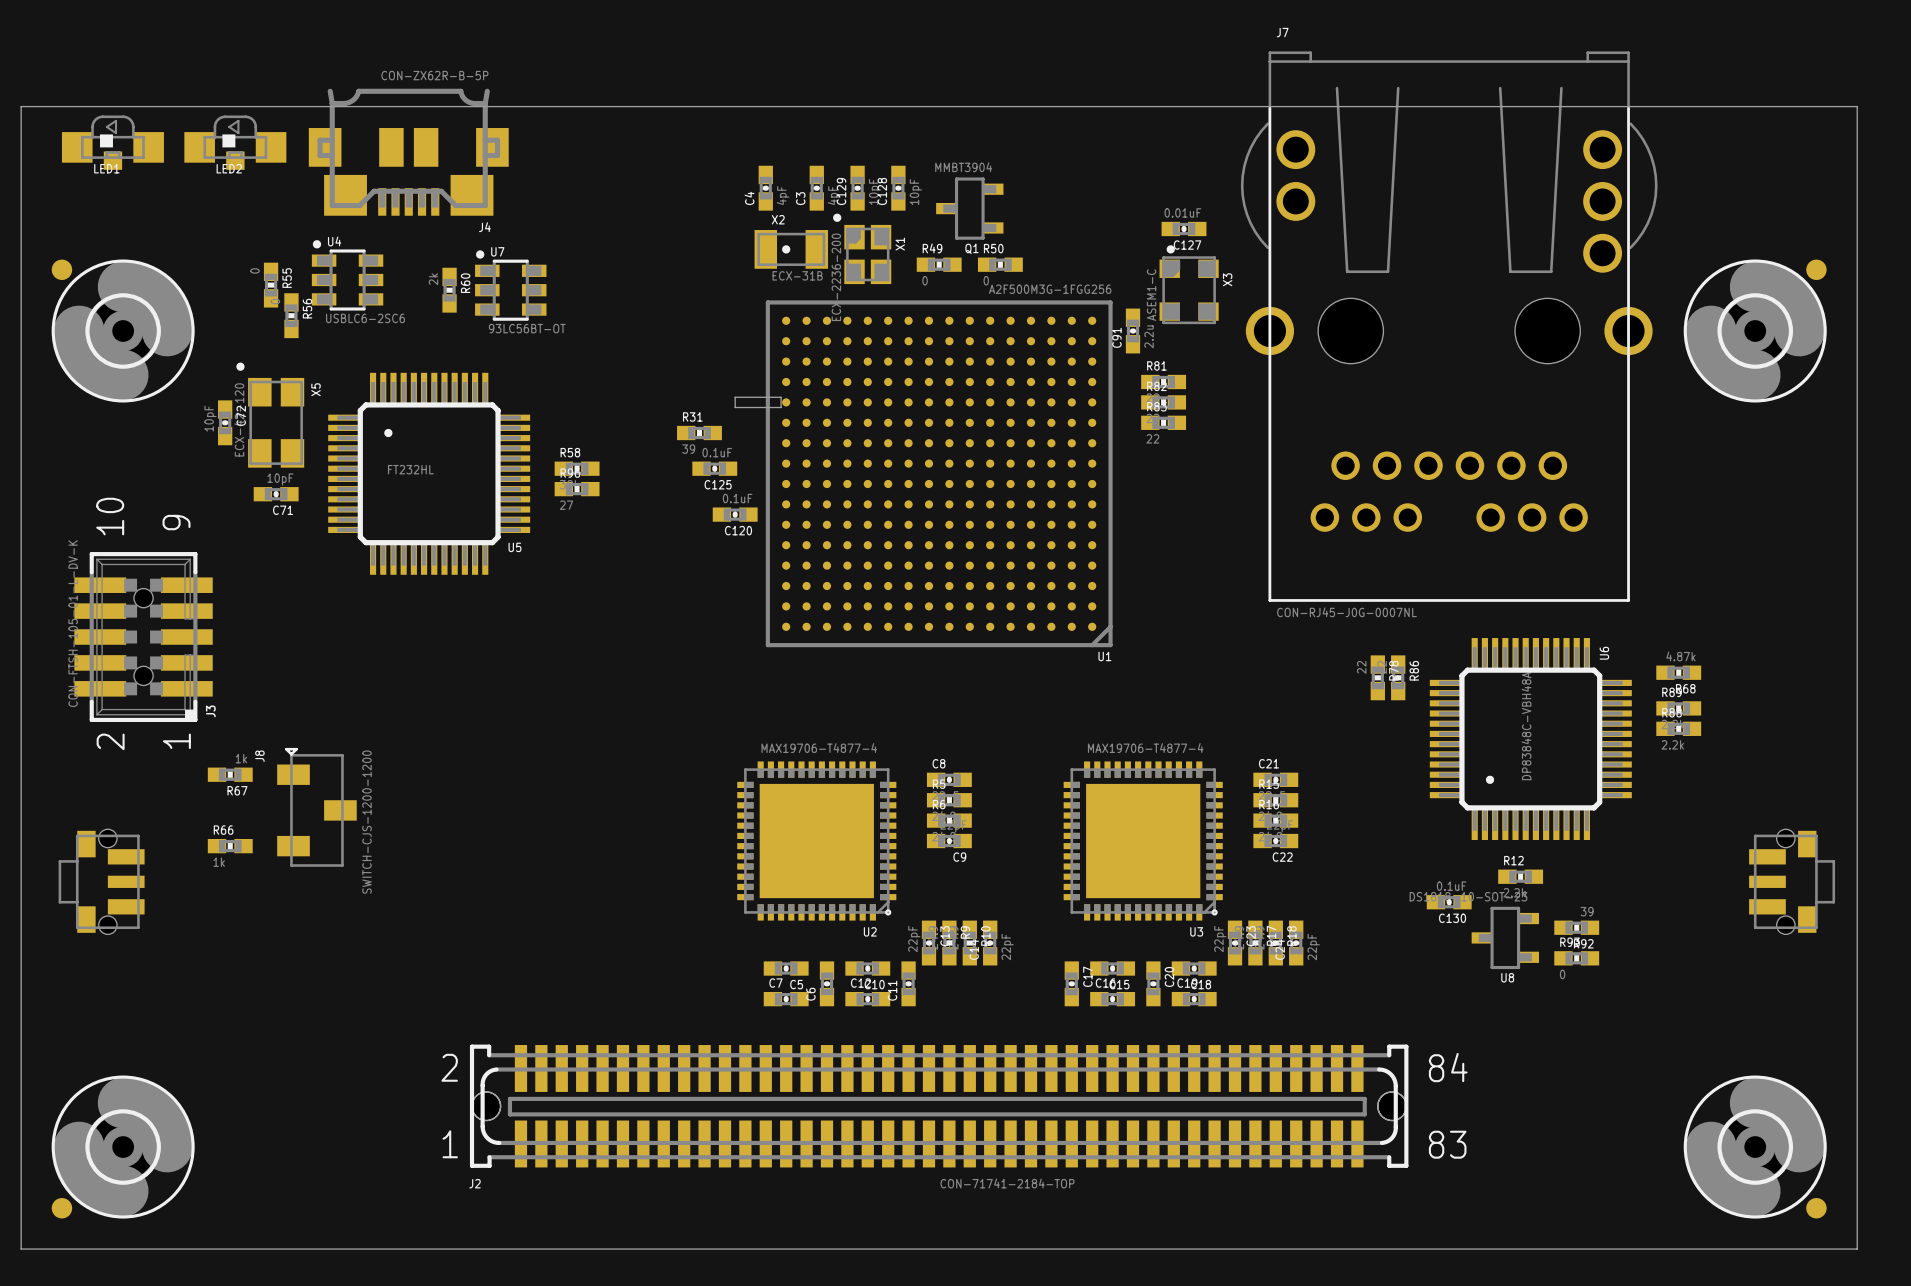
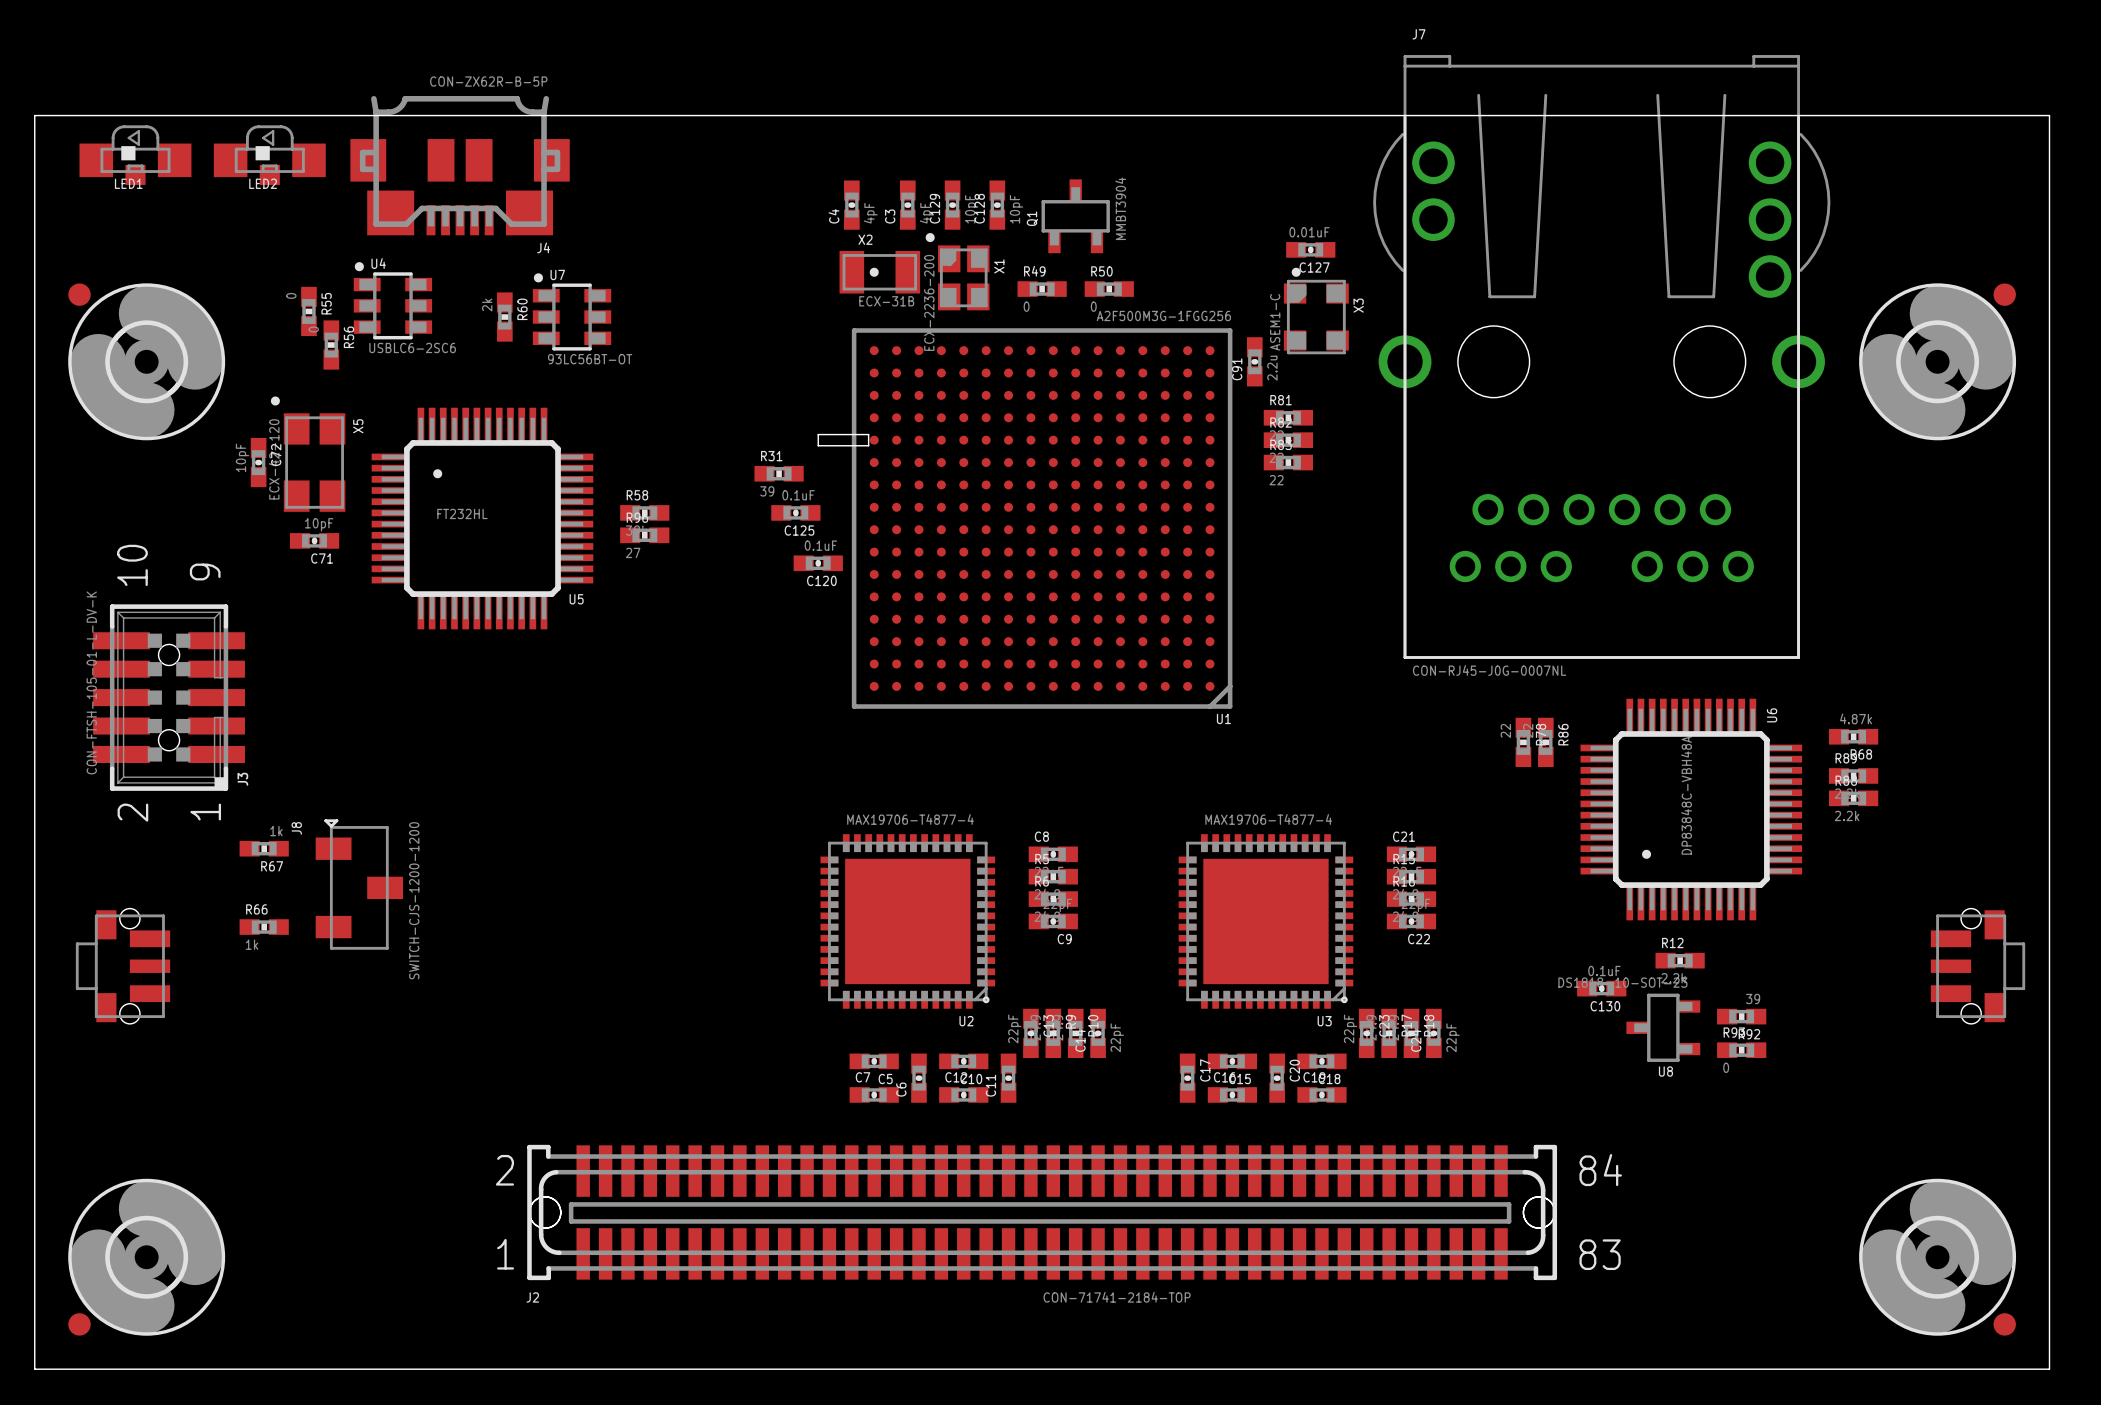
Q1 rotation: 0° (969, 208) -> 90° clockwise (1075, 216)

